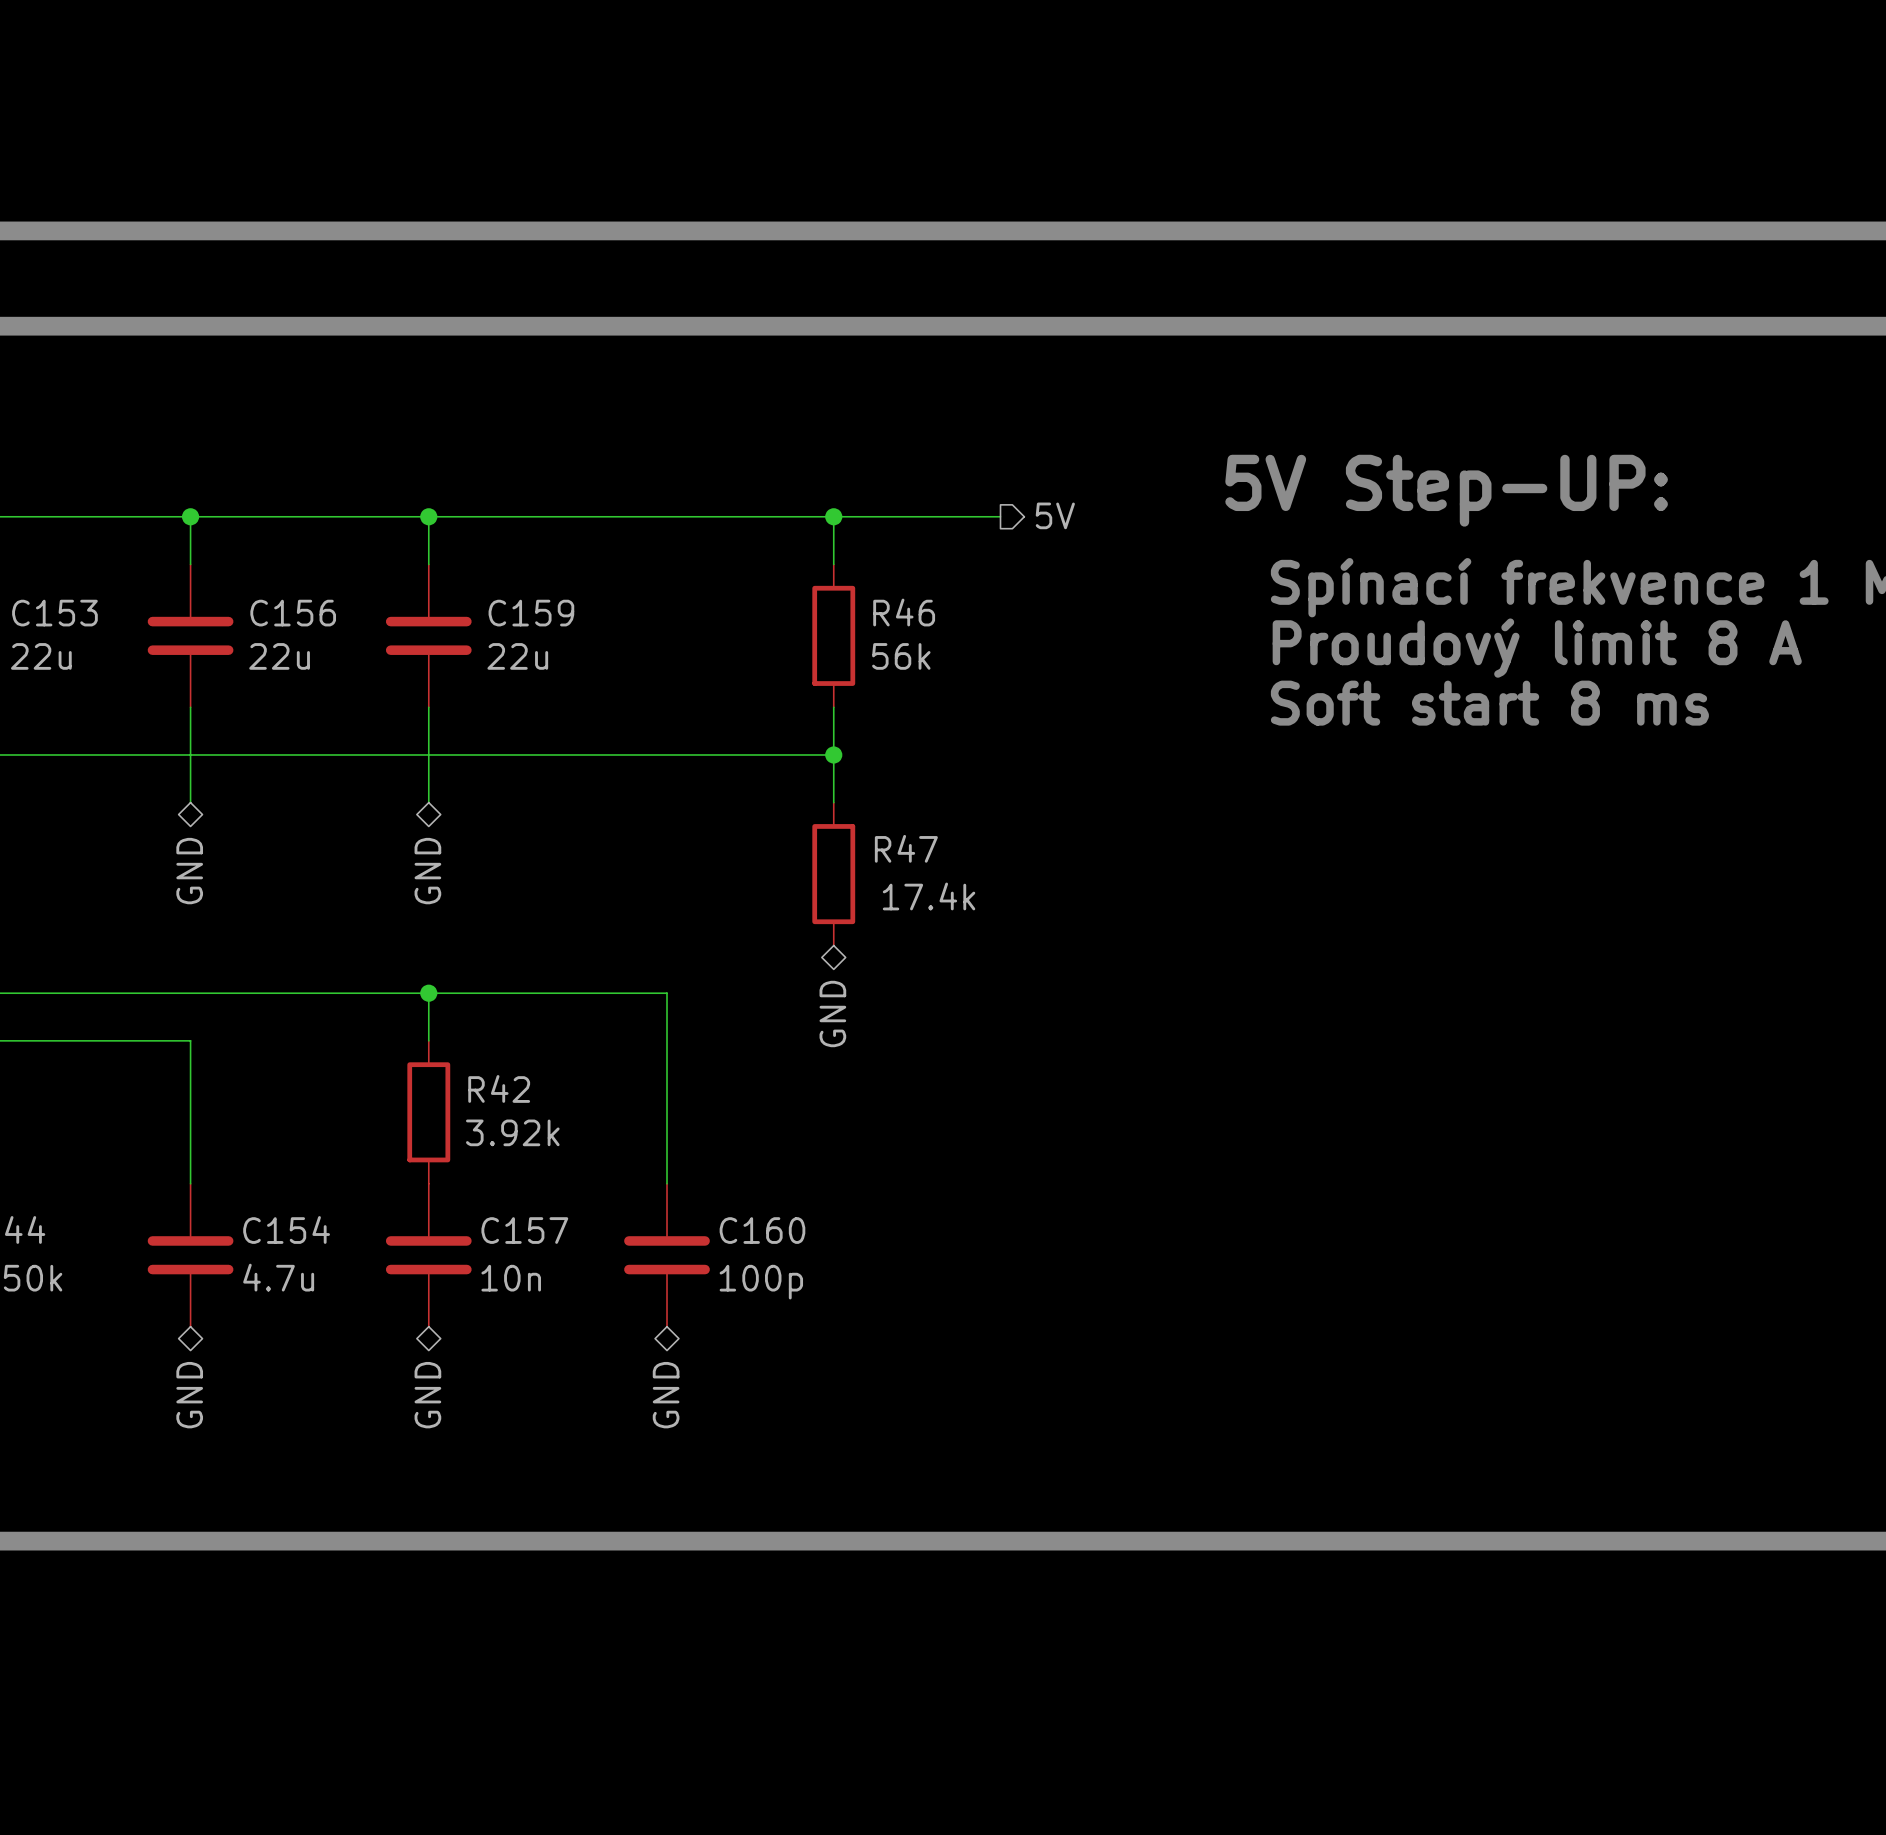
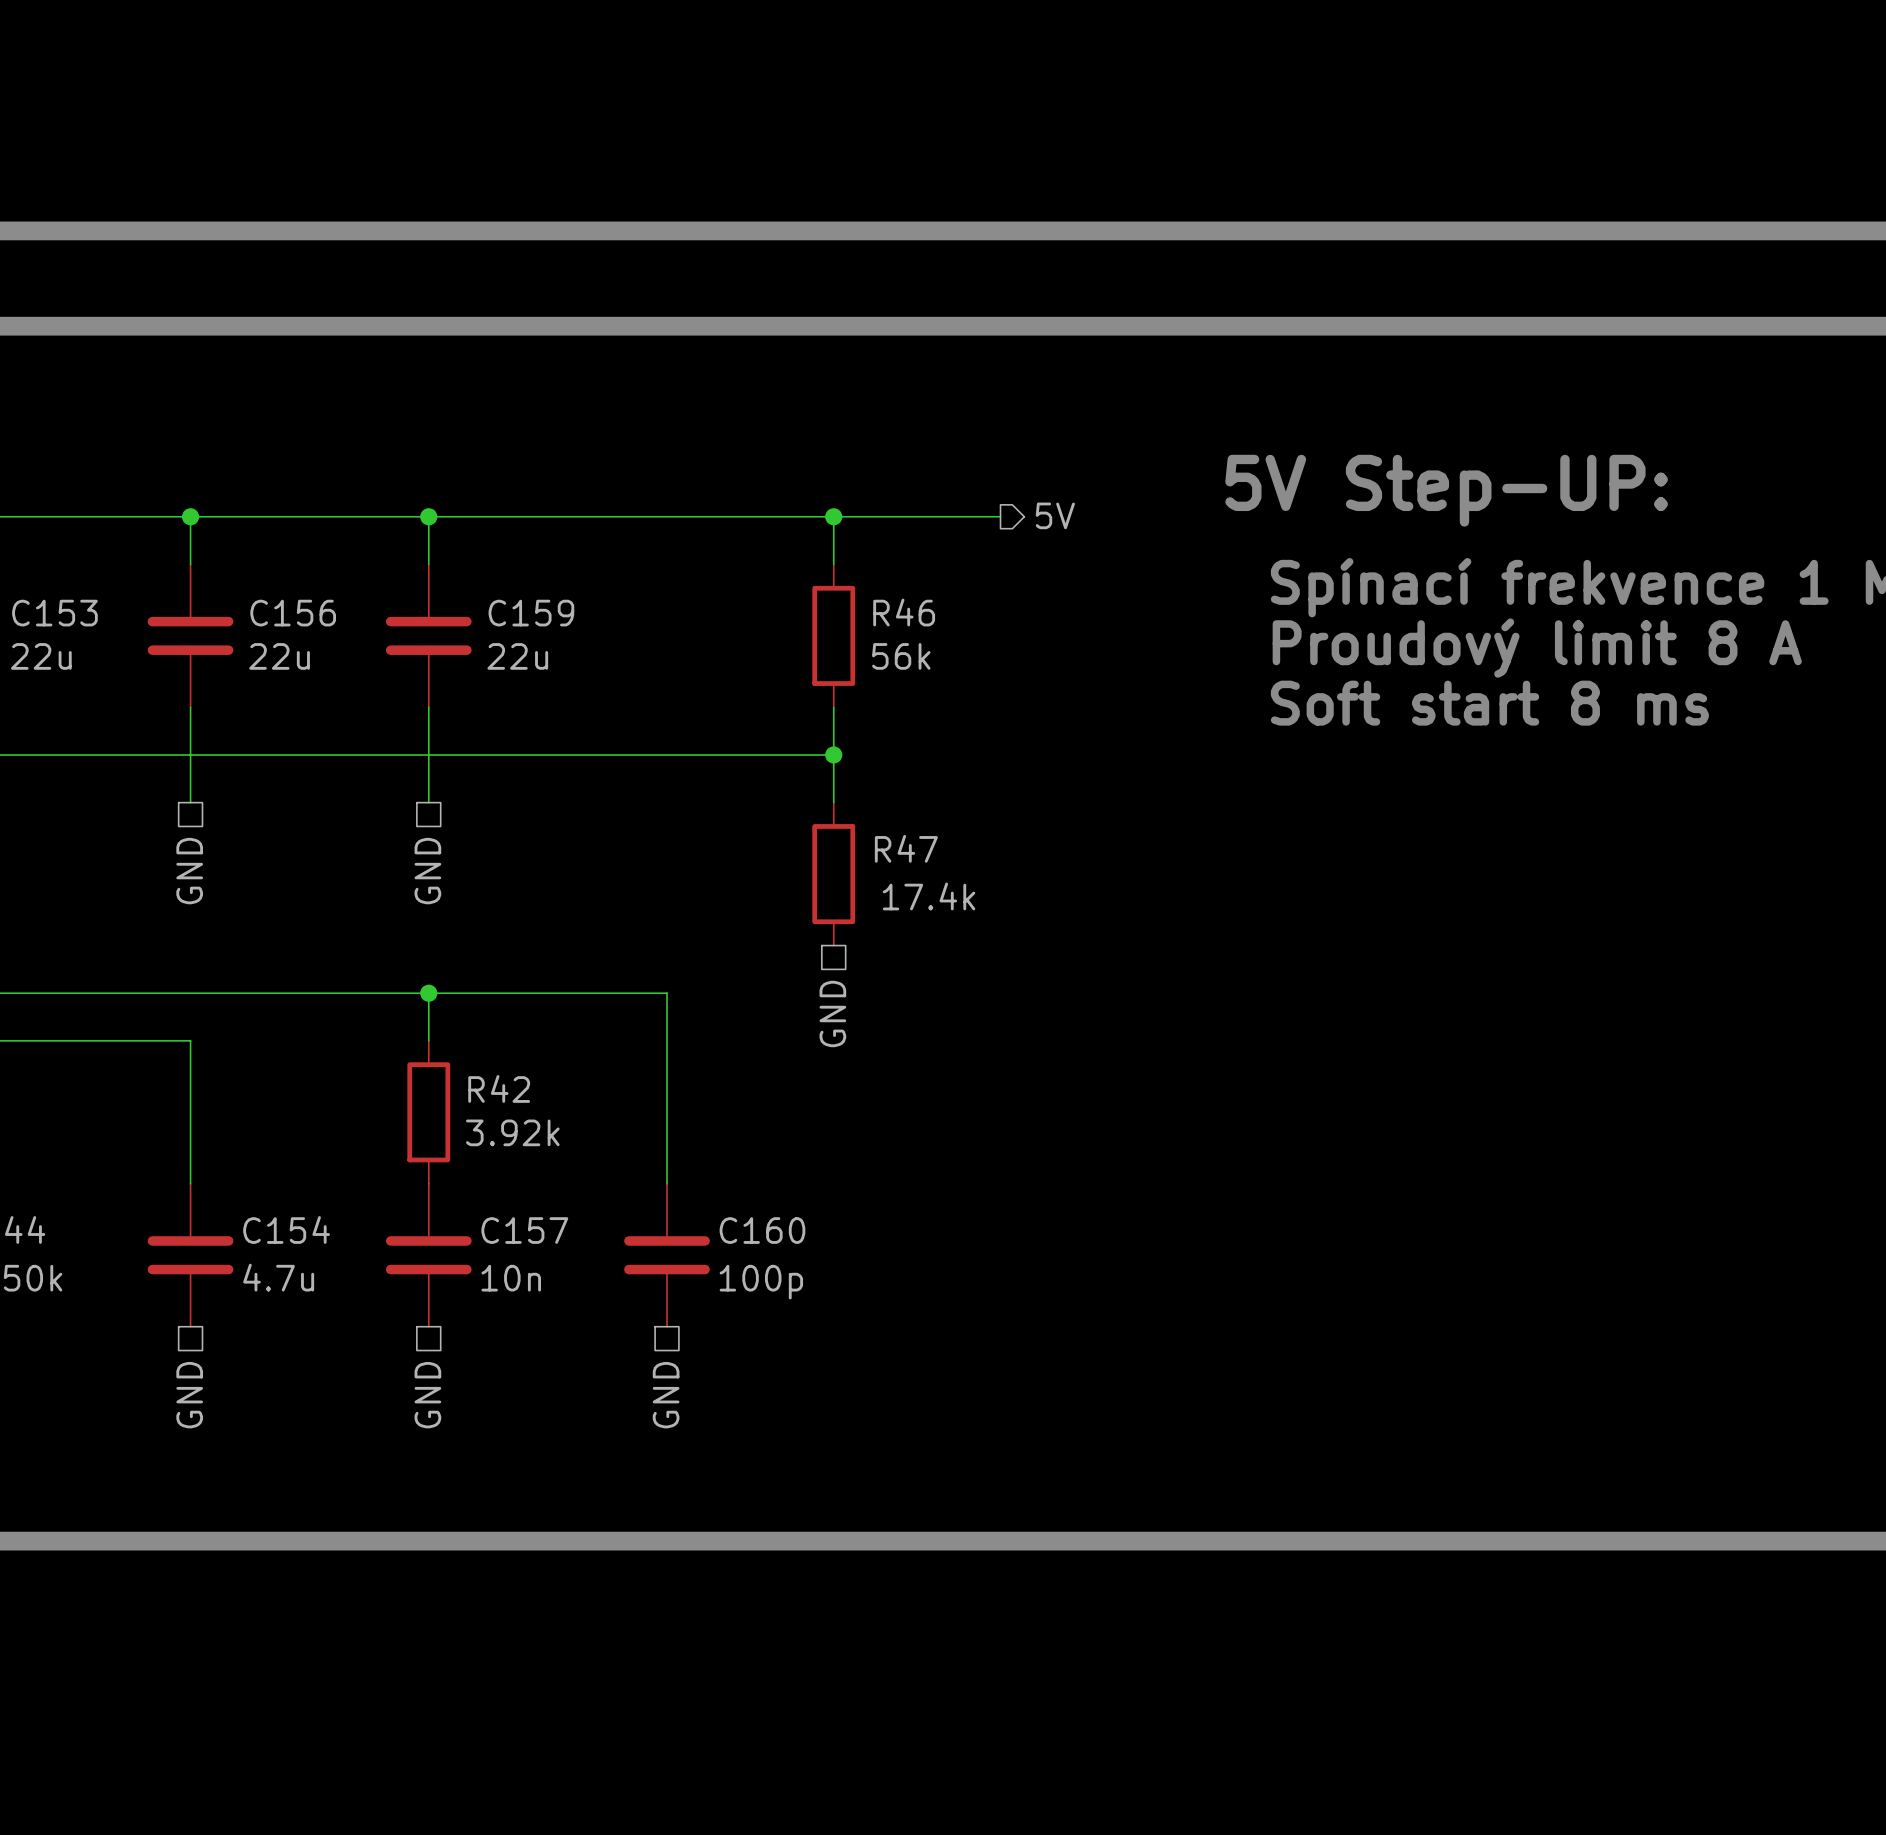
hierarchical label shape: bidirectional (189, 871) -> passive (189, 871)
hierarchical label shape: bidirectional (427, 871) -> passive (427, 871)
hierarchical label shape: bidirectional (832, 1014) -> passive (832, 1014)
hierarchical label shape: bidirectional (189, 1395) -> passive (189, 1395)
hierarchical label shape: bidirectional (427, 1395) -> passive (427, 1395)
hierarchical label shape: bidirectional (666, 1395) -> passive (666, 1395)

